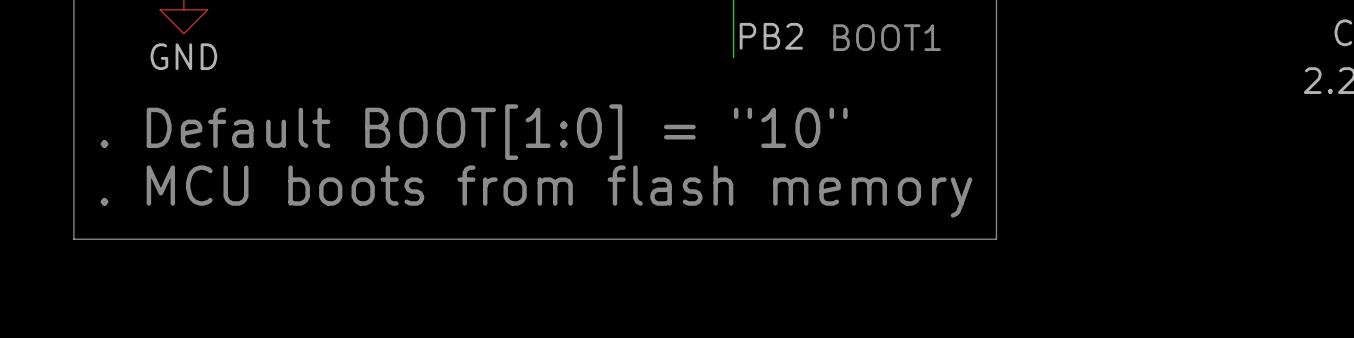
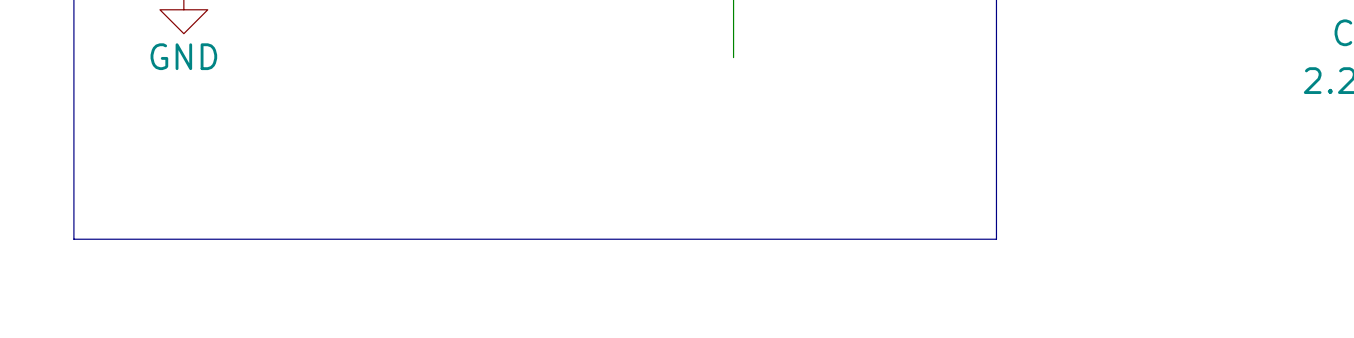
label: PB2 (771, 36) -> none
text: BOOT1 (887, 37) -> none
text: . Default BOOT[1:0] = "10" (474, 132) -> none
text: . MCU boots from flash memory (536, 191) -> none

